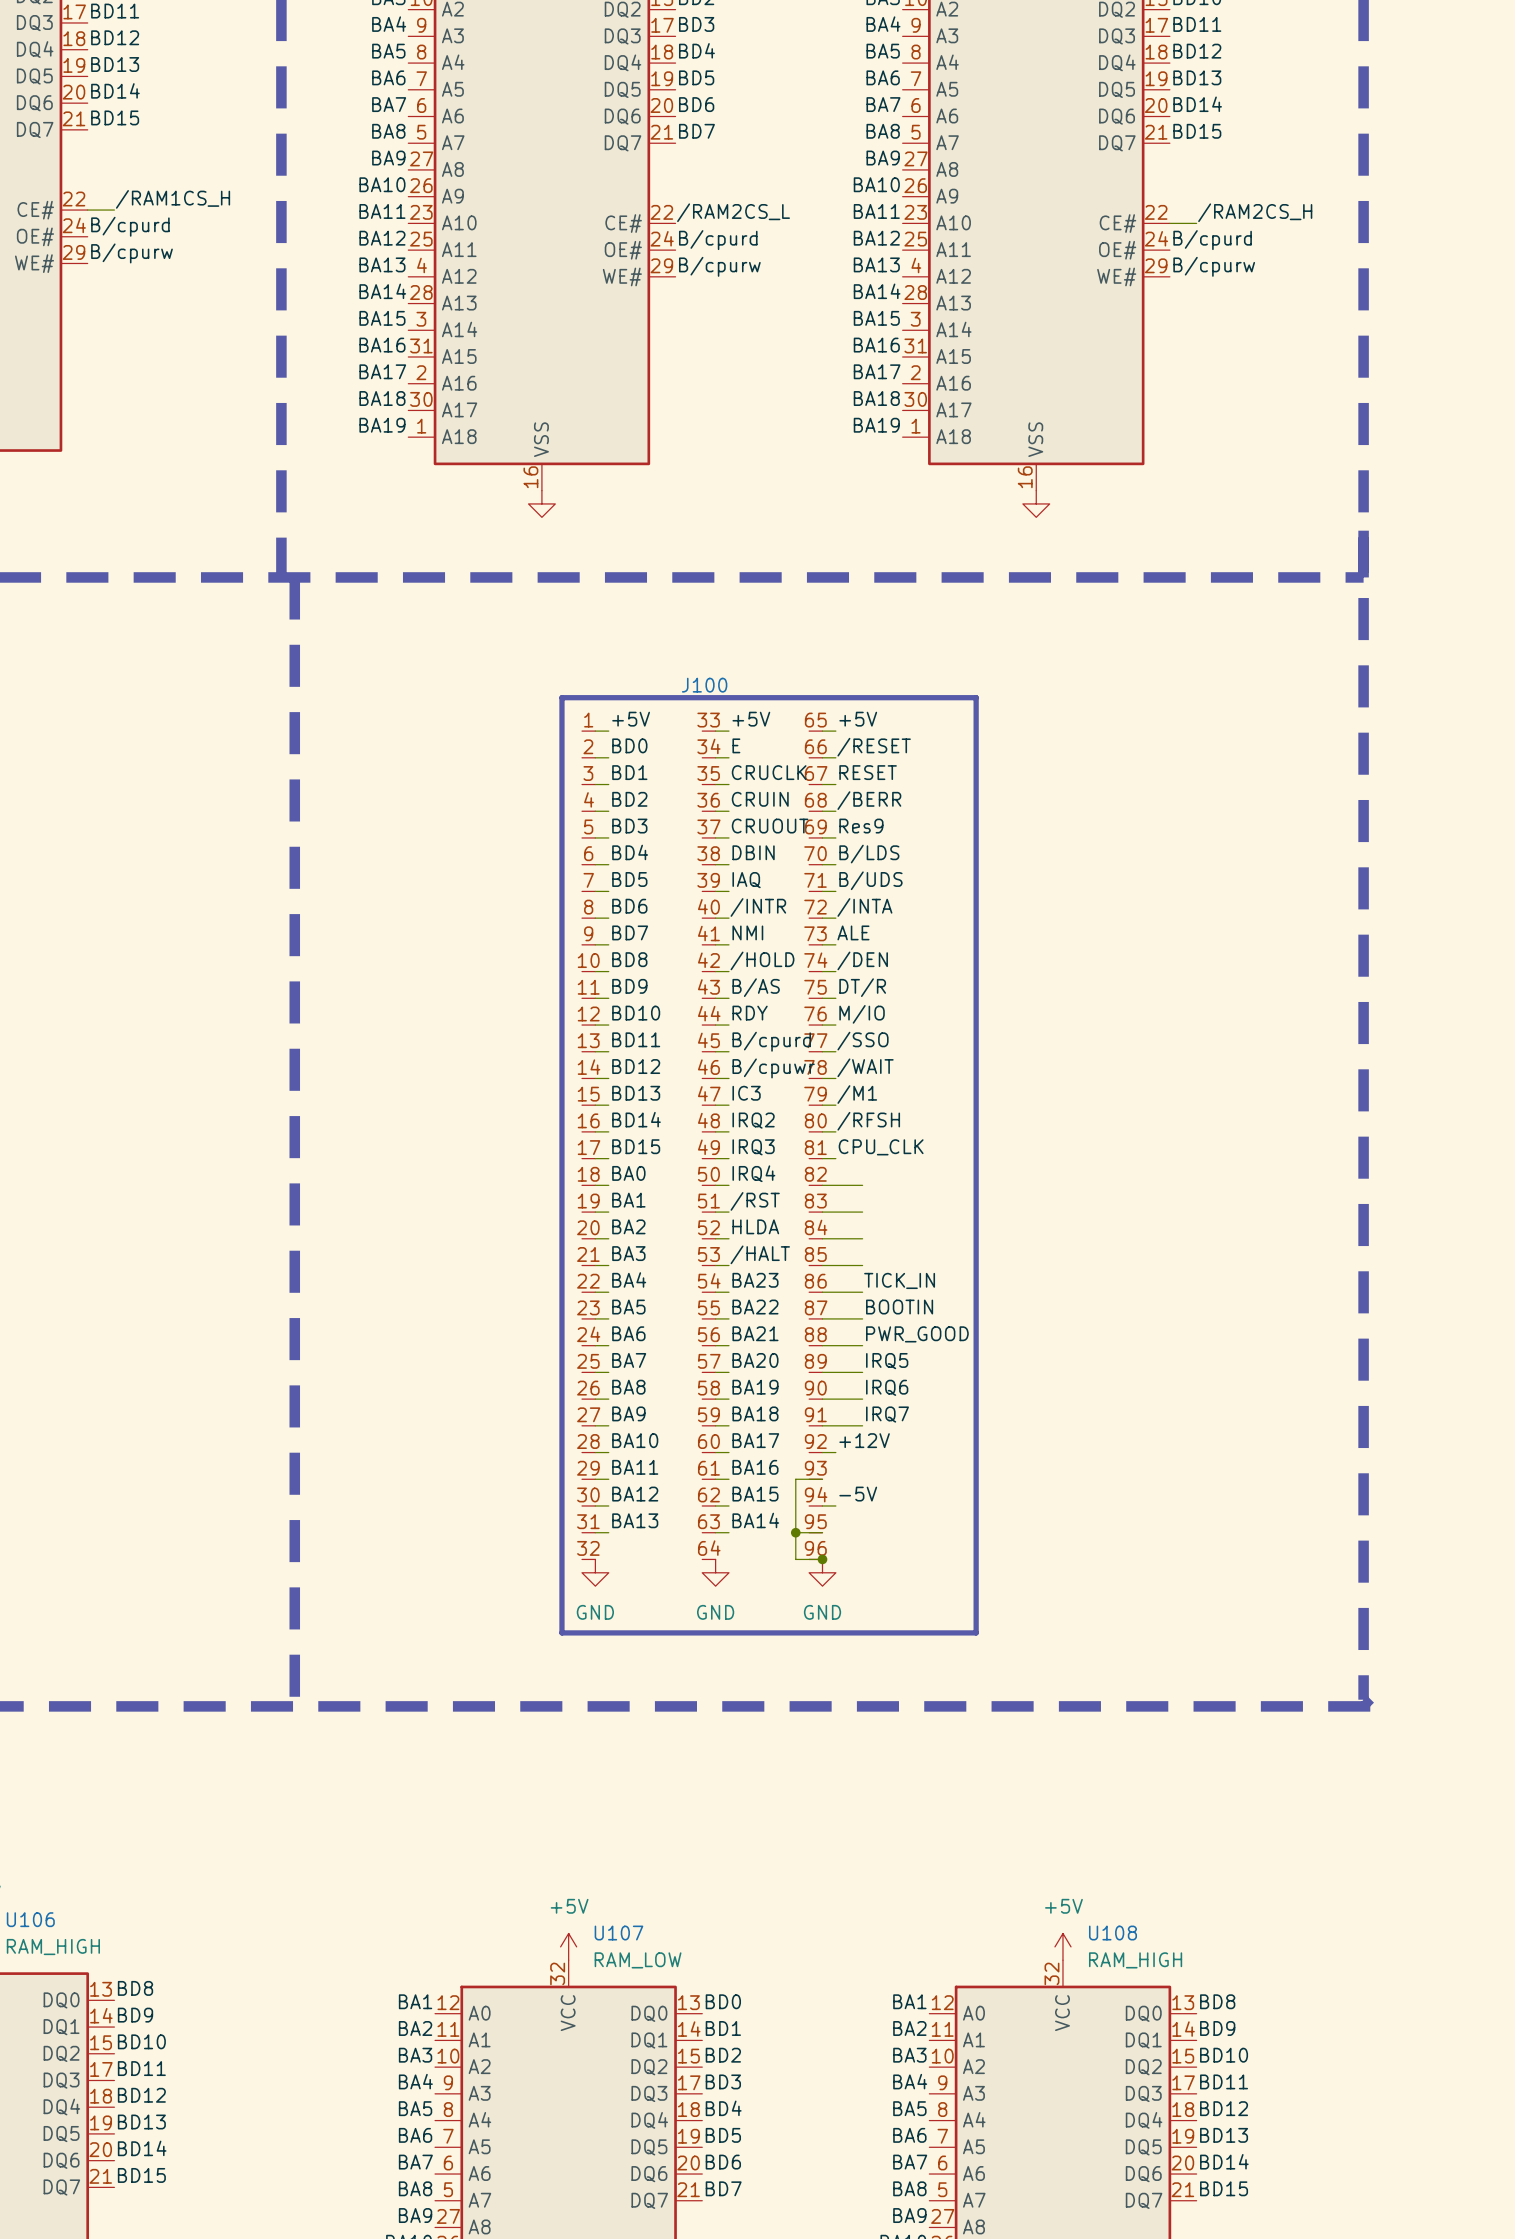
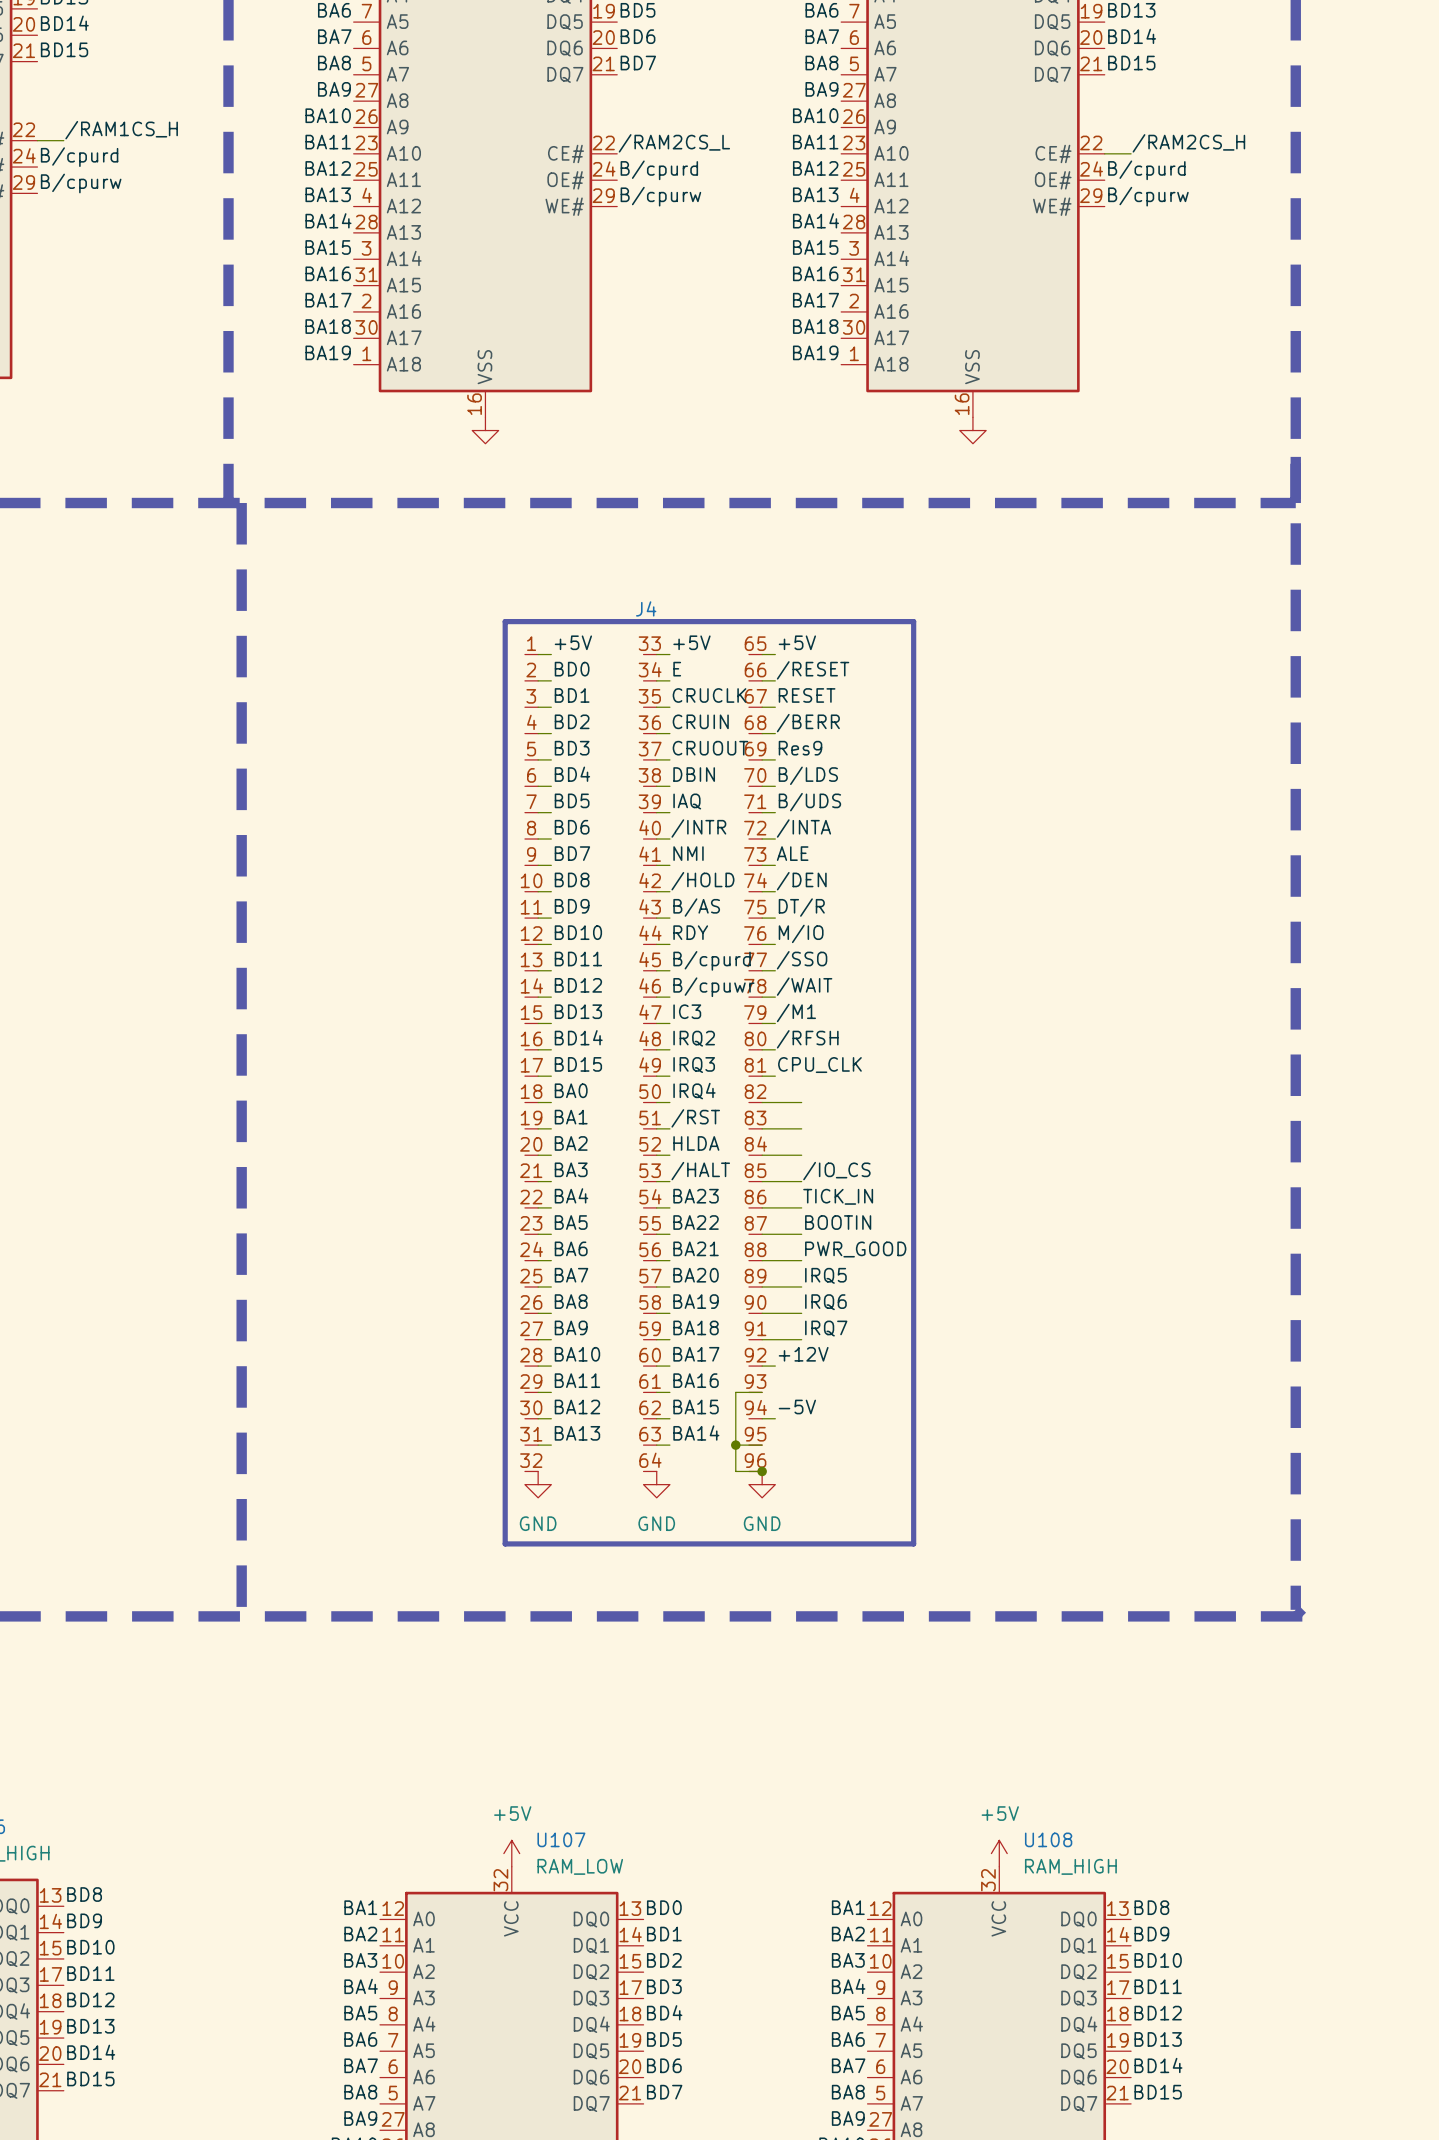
J100 name: J100 (704, 685) -> J4 (646, 608)
label: none -> /IO_CS (836, 1171)

